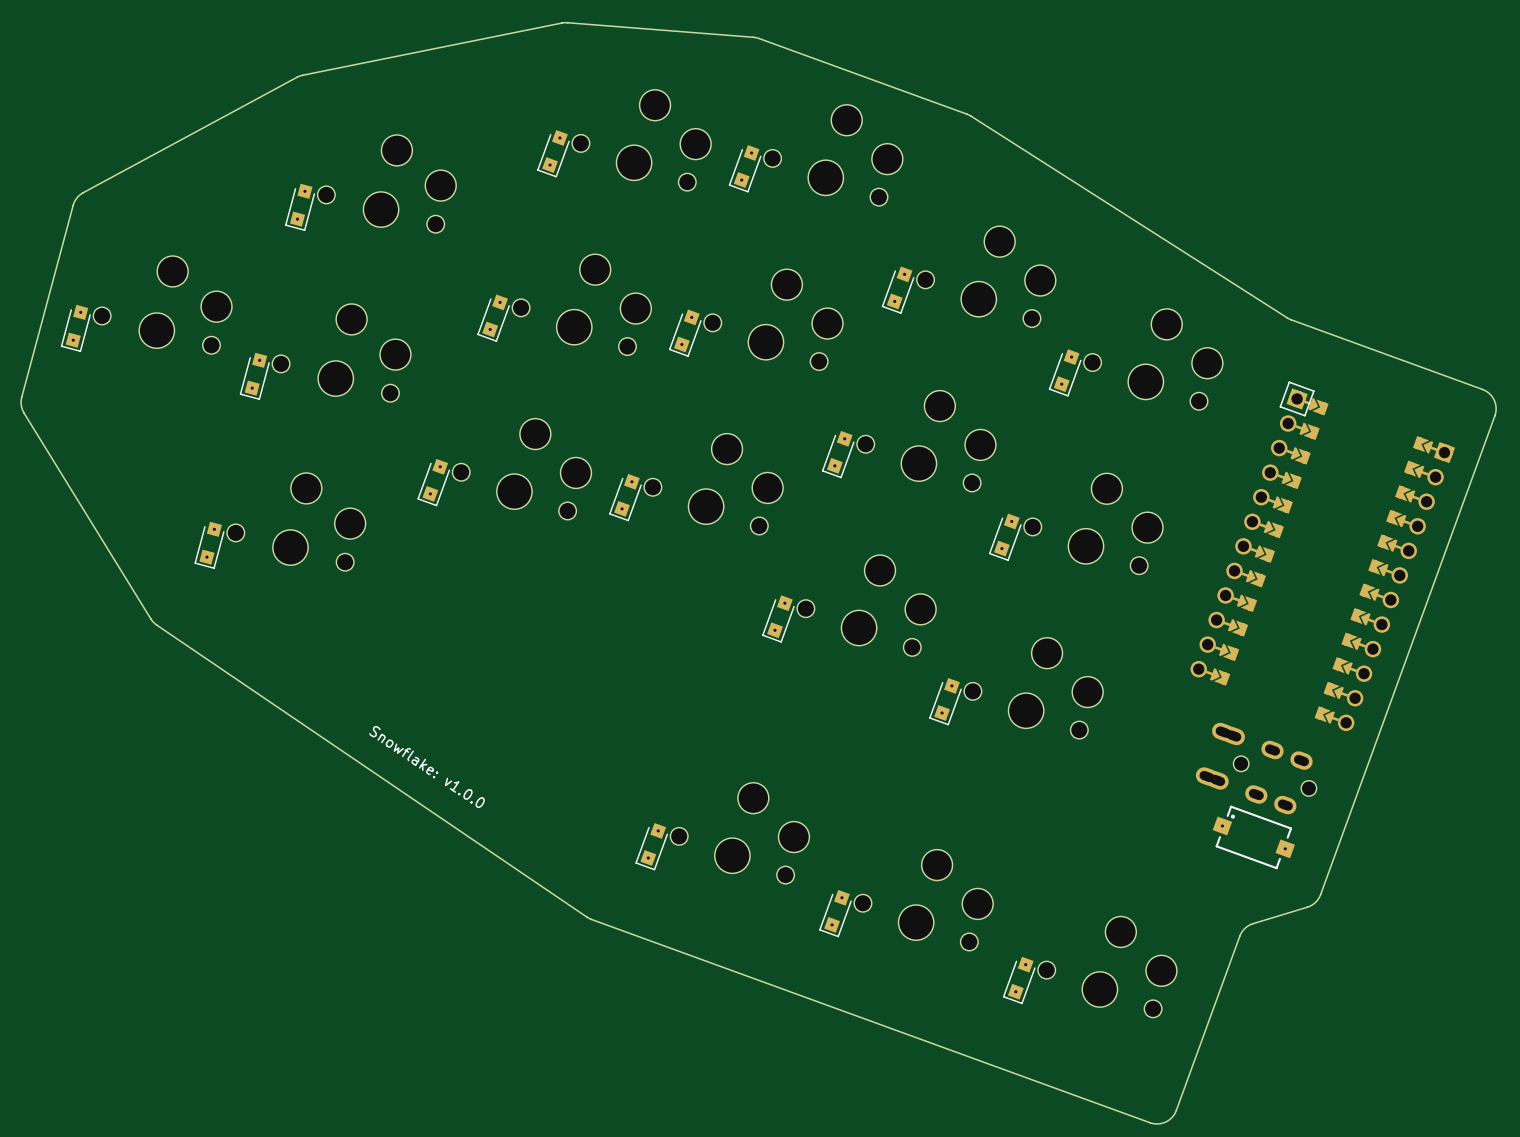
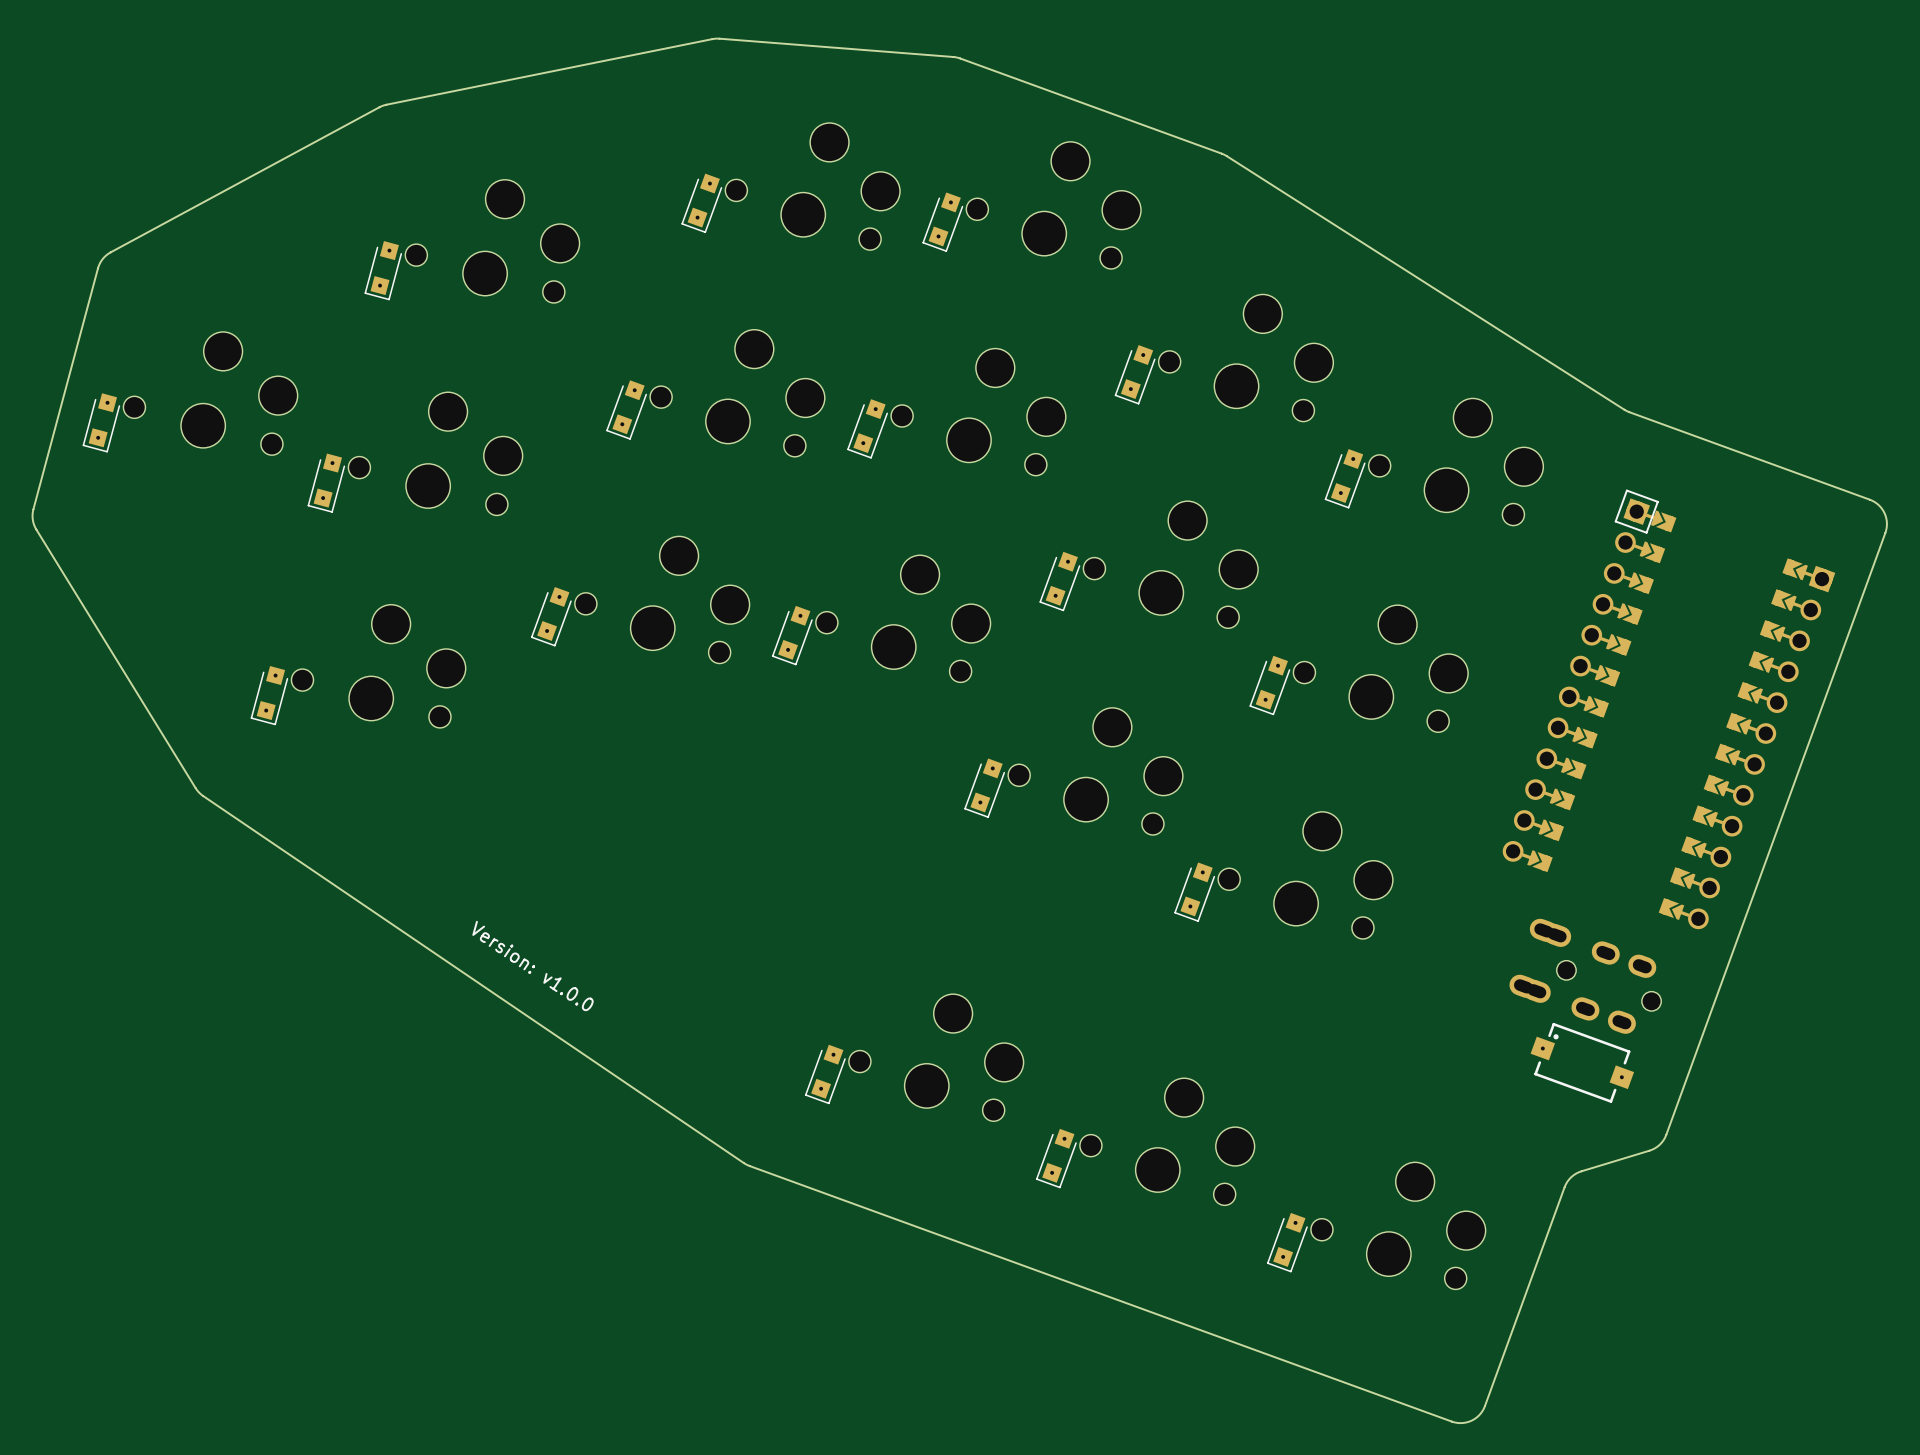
text: Snowflake: v1.0.0 (427, 767) -> Version: v1.0.0 (532, 966)

